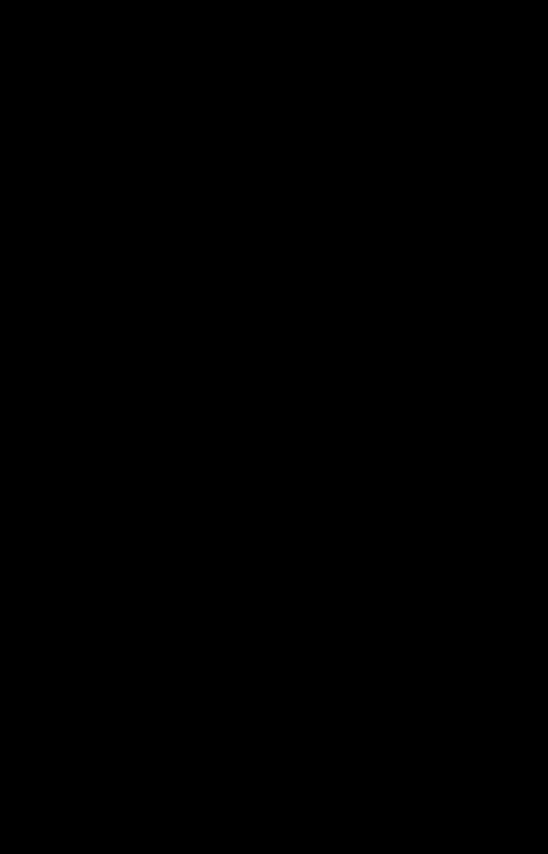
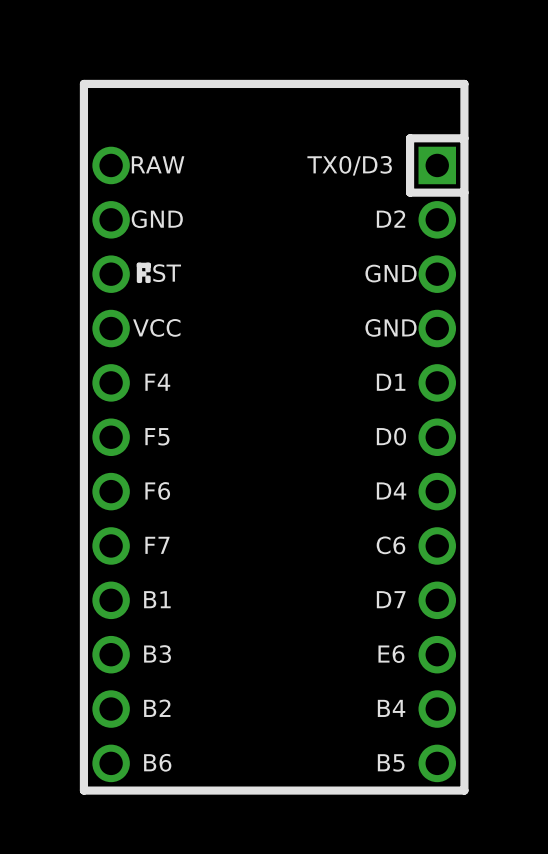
part: none -> (274, 437)

